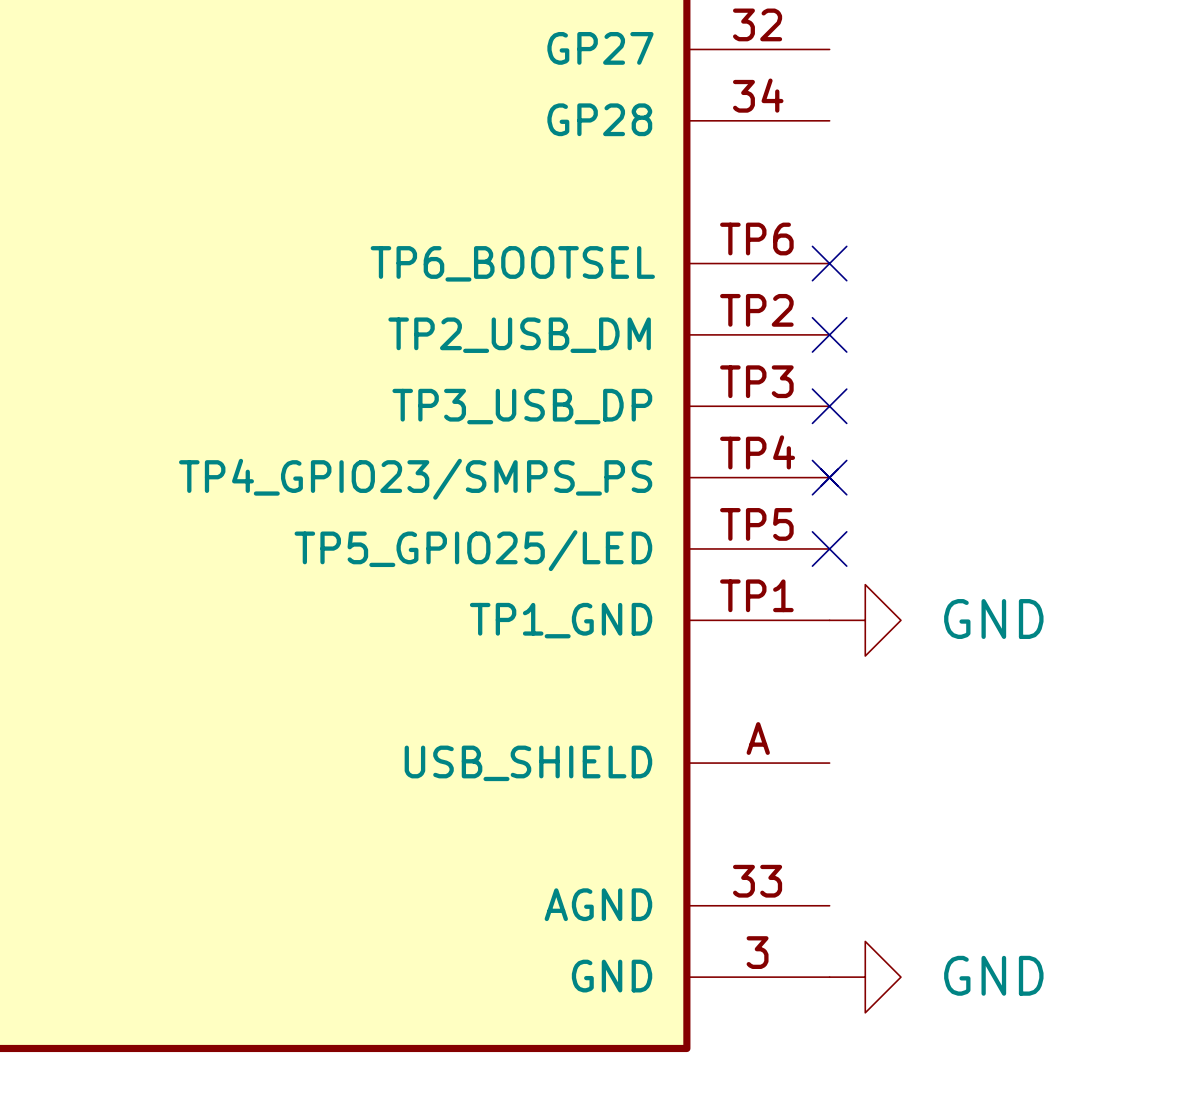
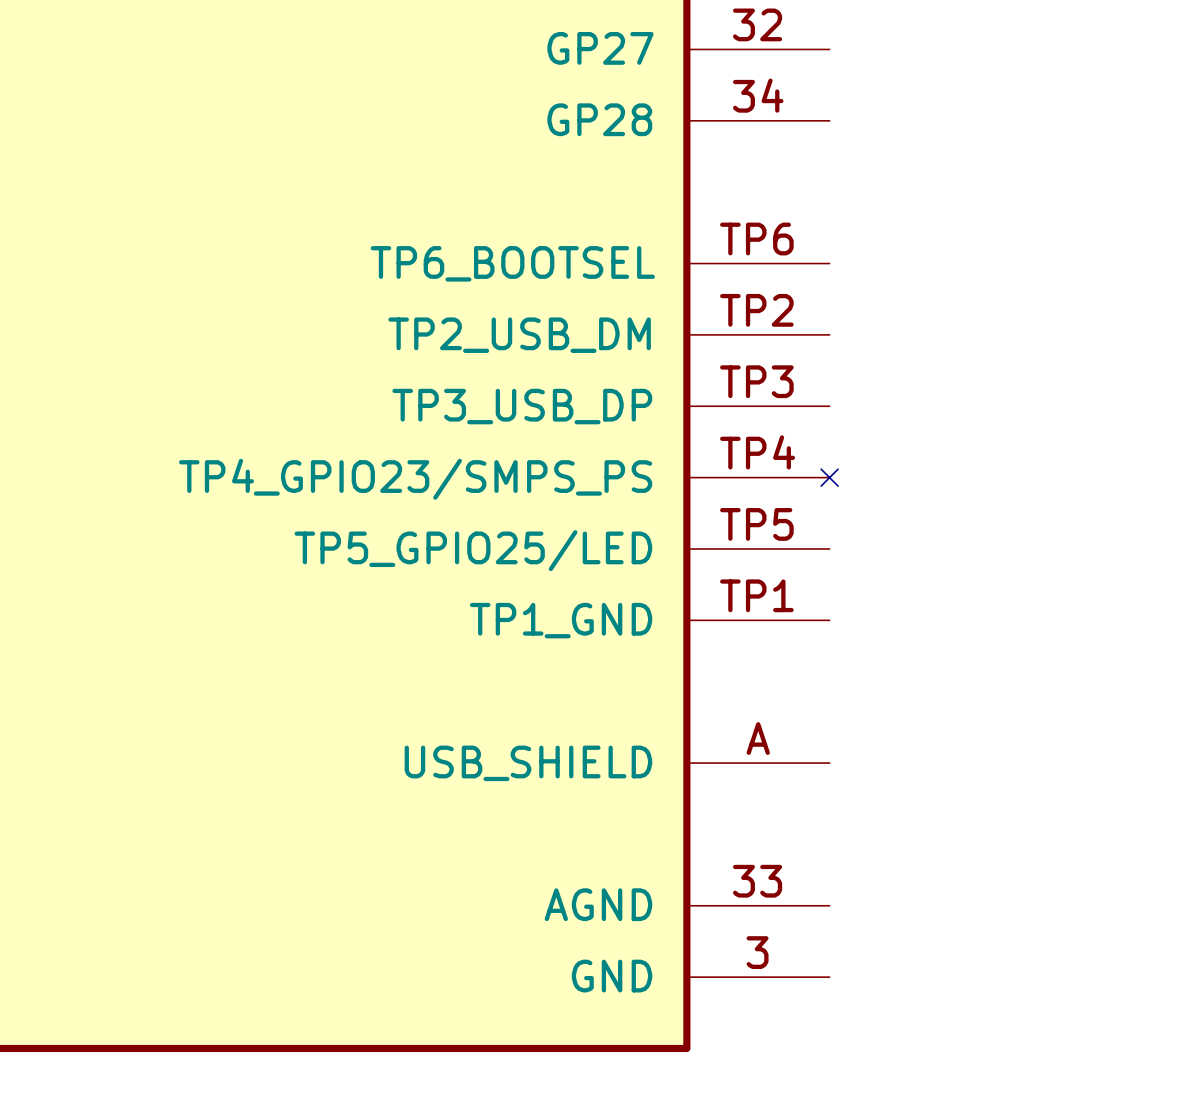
no-connect mark: (829, 263) -> none
no-connect mark: (829, 334) -> none
no-connect mark: (829, 406) -> none
no-connect mark: (829, 477) -> none
no-connect mark: (829, 548) -> none
power symbol: GND (865, 620) -> none
power symbol: GND (865, 977) -> none

